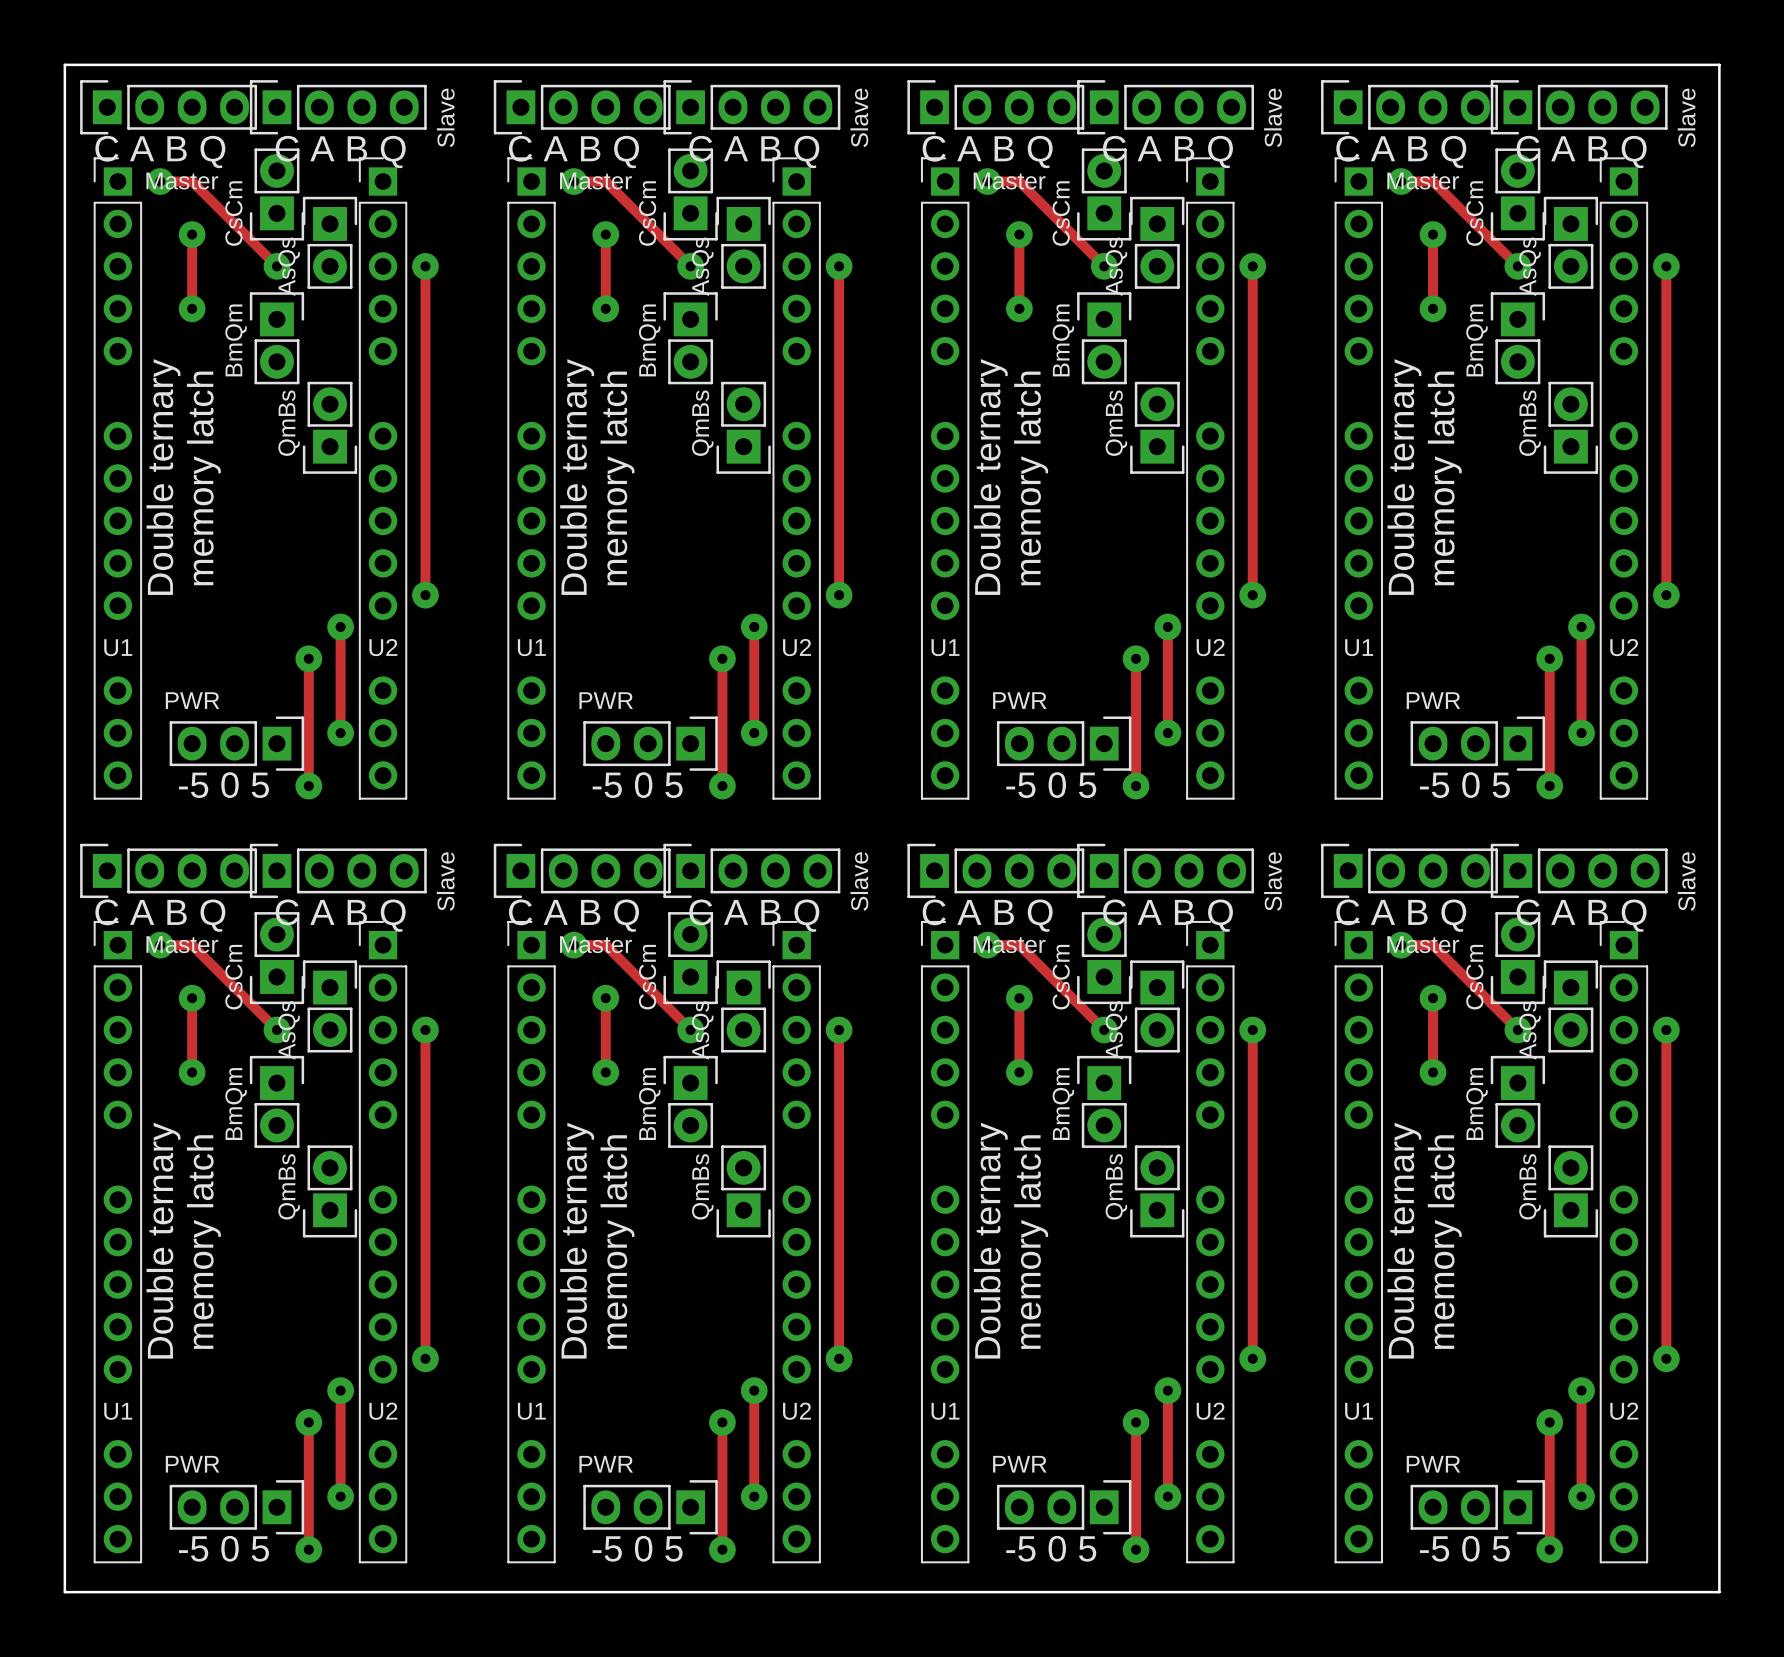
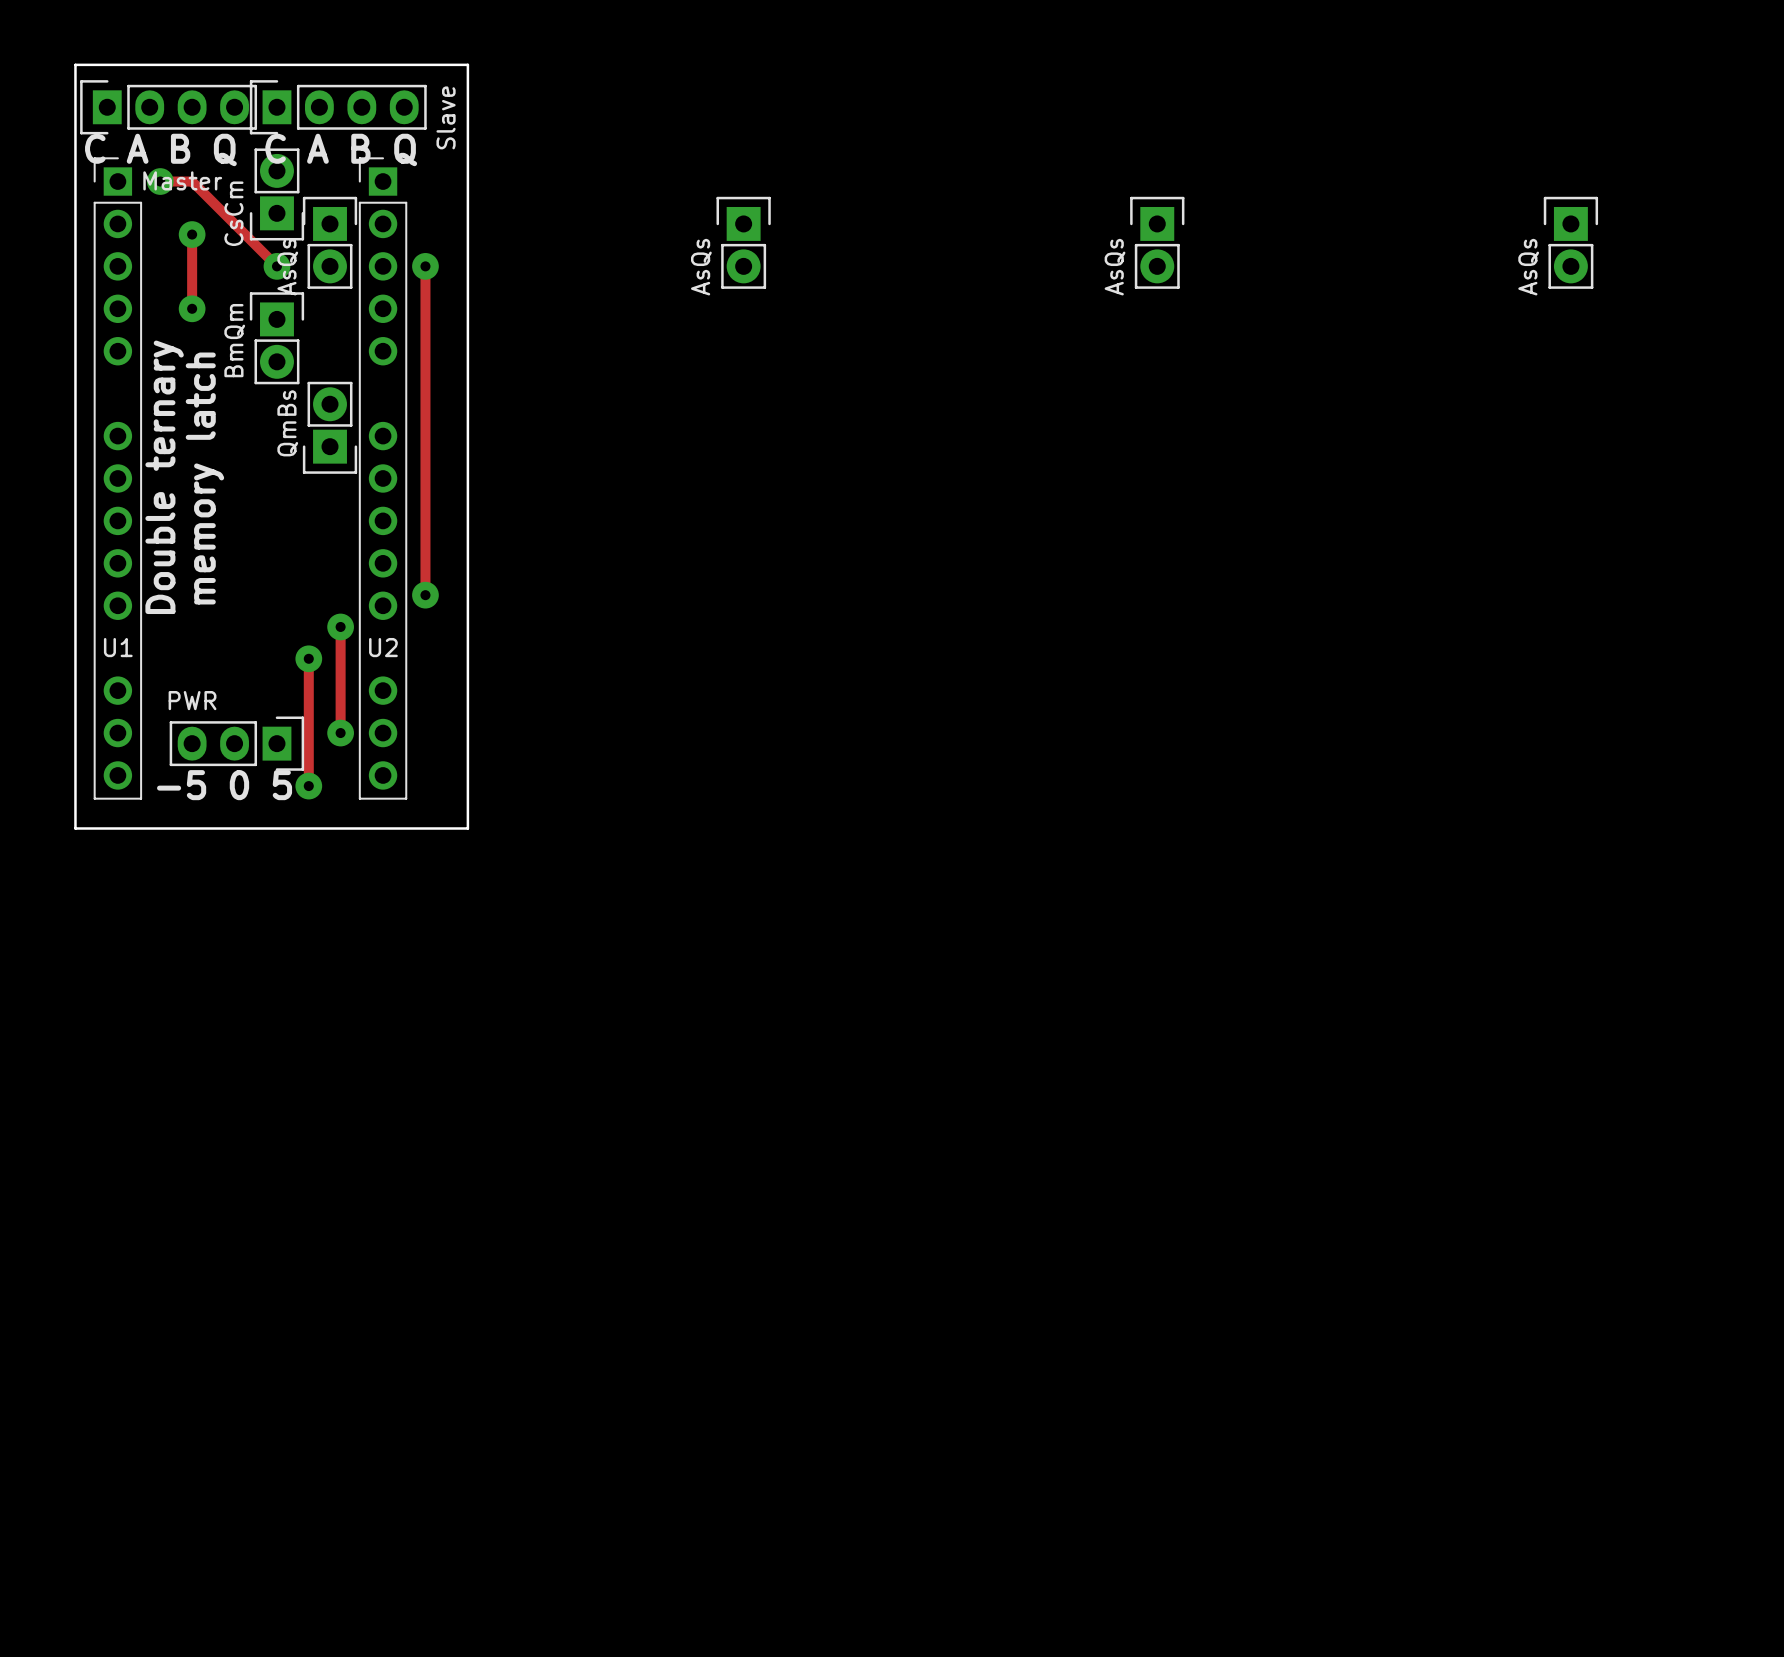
board edge: (75, 64) (64, 64) (64, 1592) (1719, 1592) (1719, 64) (467, 64) -> (75, 64) (75, 828) (467, 828) (467, 64)
Master: (582, 107) -> none
Slave: (751, 107) -> none
Master: (995, 107) -> none
Slave: (1165, 107) -> none
Master: (1409, 107) -> none
Slave: (1579, 107) -> none
text: C A B Q (574, 152) -> none
text: C A B Q (754, 152) -> none
text: C A B Q (987, 152) -> none
text: C A B Q (1167, 152) -> none
text: C A B Q (1401, 152) -> none
text: C A B Q (1581, 152) -> none
track: (573, 181) (605, 181) (690, 266) -> none
via: (573, 181) -> none
track: (987, 181) (1019, 181) (1104, 266) -> none
via: (987, 181) -> none
track: (1401, 181) (1433, 181) (1517, 266) -> none
via: (1401, 181) -> none
CsCm: (690, 194) -> none
CsCm: (1104, 194) -> none
CsCm: (1517, 194) -> none
track: (605, 234) (605, 308) -> none
via: (605, 234) -> none
track: (1019, 234) (1019, 308) -> none
via: (1019, 234) -> none
track: (1433, 234) (1433, 308) -> none
via: (1433, 234) -> none
via: (690, 266) -> none
track: (839, 266) (839, 595) -> none
via: (839, 266) -> none
via: (1104, 266) -> none
track: (1252, 266) (1252, 595) -> none
via: (1252, 266) -> none
via: (1517, 266) -> none
track: (1666, 266) (1666, 595) -> none
via: (1666, 266) -> none
via: (605, 308) -> none
via: (1019, 308) -> none
via: (1433, 308) -> none
BmQm: (690, 338) -> none
BmQm: (1104, 338) -> none
BmQm: (1517, 338) -> none
QmBs: (743, 427) -> none
QmBs: (1157, 427) -> none
QmBs: (1570, 427) -> none
text: Double ternary (577, 477) -> none
text: Double ternary (990, 477) -> none
text: Double ternary (1404, 477) -> none
U1: (531, 478) -> none
text: memory latch (617, 478) -> none
U2: (796, 478) -> none
U1: (945, 478) -> none
text: memory latch (1031, 478) -> none
U2: (1210, 478) -> none
U1: (1358, 478) -> none
text: memory latch (1444, 478) -> none
U2: (1623, 478) -> none
via: (839, 595) -> none
via: (1252, 595) -> none
via: (1666, 595) -> none
track: (754, 626) (754, 733) -> none
via: (754, 626) -> none
track: (1167, 626) (1167, 733) -> none
via: (1167, 626) -> none
track: (1581, 626) (1581, 733) -> none
via: (1581, 626) -> none
track: (722, 658) (722, 786) -> none
via: (722, 658) -> none
track: (1136, 658) (1136, 786) -> none
via: (1136, 658) -> none
track: (1549, 658) (1549, 786) -> none
via: (1549, 658) -> none
via: (754, 733) -> none
via: (1167, 733) -> none
via: (1581, 733) -> none
PWR: (650, 743) -> none
PWR: (1064, 743) -> none
PWR: (1477, 743) -> none
text: -5 0 5 (637, 785) -> none
text: -5 0 5 (1051, 785) -> none
text: -5 0 5 (1464, 785) -> none
via: (722, 786) -> none
via: (1136, 786) -> none
via: (1549, 786) -> none
Master: (168, 870) -> none
Slave: (338, 870) -> none
Master: (582, 870) -> none
Slave: (751, 870) -> none
Master: (995, 870) -> none
Slave: (1165, 870) -> none
Master: (1409, 870) -> none
Slave: (1579, 870) -> none
text: C A B Q (160, 915) -> none
text: C A B Q (340, 915) -> none
text: C A B Q (574, 915) -> none
text: C A B Q (754, 915) -> none
text: C A B Q (987, 915) -> none
text: C A B Q (1167, 915) -> none
text: C A B Q (1401, 915) -> none
text: C A B Q (1581, 915) -> none
track: (160, 945) (192, 945) (276, 1030) -> none
via: (160, 945) -> none
track: (573, 945) (605, 945) (690, 1030) -> none
via: (573, 945) -> none
track: (987, 945) (1019, 945) (1104, 1030) -> none
via: (987, 945) -> none
track: (1401, 945) (1433, 945) (1517, 1030) -> none
via: (1401, 945) -> none
CsCm: (276, 958) -> none
CsCm: (690, 958) -> none
CsCm: (1104, 958) -> none
CsCm: (1517, 958) -> none
track: (192, 998) (192, 1072) -> none
via: (192, 998) -> none
track: (605, 998) (605, 1072) -> none
via: (605, 998) -> none
track: (1019, 998) (1019, 1072) -> none
via: (1019, 998) -> none
track: (1433, 998) (1433, 1072) -> none
via: (1433, 998) -> none
AsQs: (330, 1006) -> none
AsQs: (743, 1006) -> none
AsQs: (1157, 1006) -> none
AsQs: (1570, 1006) -> none
via: (276, 1030) -> none
track: (425, 1030) (425, 1358) -> none
via: (425, 1030) -> none
via: (690, 1030) -> none
track: (839, 1030) (839, 1358) -> none
via: (839, 1030) -> none
via: (1104, 1030) -> none
track: (1252, 1030) (1252, 1358) -> none
via: (1252, 1030) -> none
via: (1517, 1030) -> none
track: (1666, 1030) (1666, 1358) -> none
via: (1666, 1030) -> none
via: (192, 1072) -> none
via: (605, 1072) -> none
via: (1019, 1072) -> none
via: (1433, 1072) -> none
BmQm: (276, 1101) -> none
BmQm: (690, 1101) -> none
BmQm: (1104, 1101) -> none
BmQm: (1517, 1101) -> none
QmBs: (330, 1191) -> none
QmBs: (743, 1191) -> none
QmBs: (1157, 1191) -> none
QmBs: (1570, 1191) -> none
text: Double ternary (163, 1240) -> none
text: Double ternary (577, 1240) -> none
text: Double ternary (990, 1240) -> none
text: Double ternary (1404, 1240) -> none
U1: (117, 1242) -> none
text: memory latch (203, 1242) -> none
U2: (383, 1242) -> none
U1: (531, 1242) -> none
text: memory latch (617, 1242) -> none
U2: (796, 1242) -> none
U1: (945, 1242) -> none
text: memory latch (1031, 1242) -> none
U2: (1210, 1242) -> none
U1: (1358, 1242) -> none
text: memory latch (1444, 1242) -> none
U2: (1623, 1242) -> none
via: (425, 1358) -> none
via: (839, 1358) -> none
via: (1252, 1358) -> none
via: (1666, 1358) -> none
track: (340, 1390) (340, 1496) -> none
via: (340, 1390) -> none
track: (754, 1390) (754, 1496) -> none
via: (754, 1390) -> none
track: (1167, 1390) (1167, 1496) -> none
via: (1167, 1390) -> none
track: (1581, 1390) (1581, 1496) -> none
via: (1581, 1390) -> none
track: (308, 1422) (308, 1549) -> none
via: (308, 1422) -> none
track: (722, 1422) (722, 1549) -> none
via: (722, 1422) -> none
track: (1136, 1422) (1136, 1549) -> none
via: (1136, 1422) -> none
track: (1549, 1422) (1549, 1549) -> none
via: (1549, 1422) -> none
via: (340, 1496) -> none
via: (754, 1496) -> none
via: (1167, 1496) -> none
via: (1581, 1496) -> none
PWR: (236, 1507) -> none
PWR: (650, 1507) -> none
PWR: (1064, 1507) -> none
PWR: (1477, 1507) -> none
text: -5 0 5 (223, 1548) -> none
text: -5 0 5 (637, 1548) -> none
text: -5 0 5 (1051, 1548) -> none
text: -5 0 5 (1464, 1548) -> none
via: (308, 1549) -> none
via: (722, 1549) -> none
via: (1136, 1549) -> none
via: (1549, 1549) -> none

